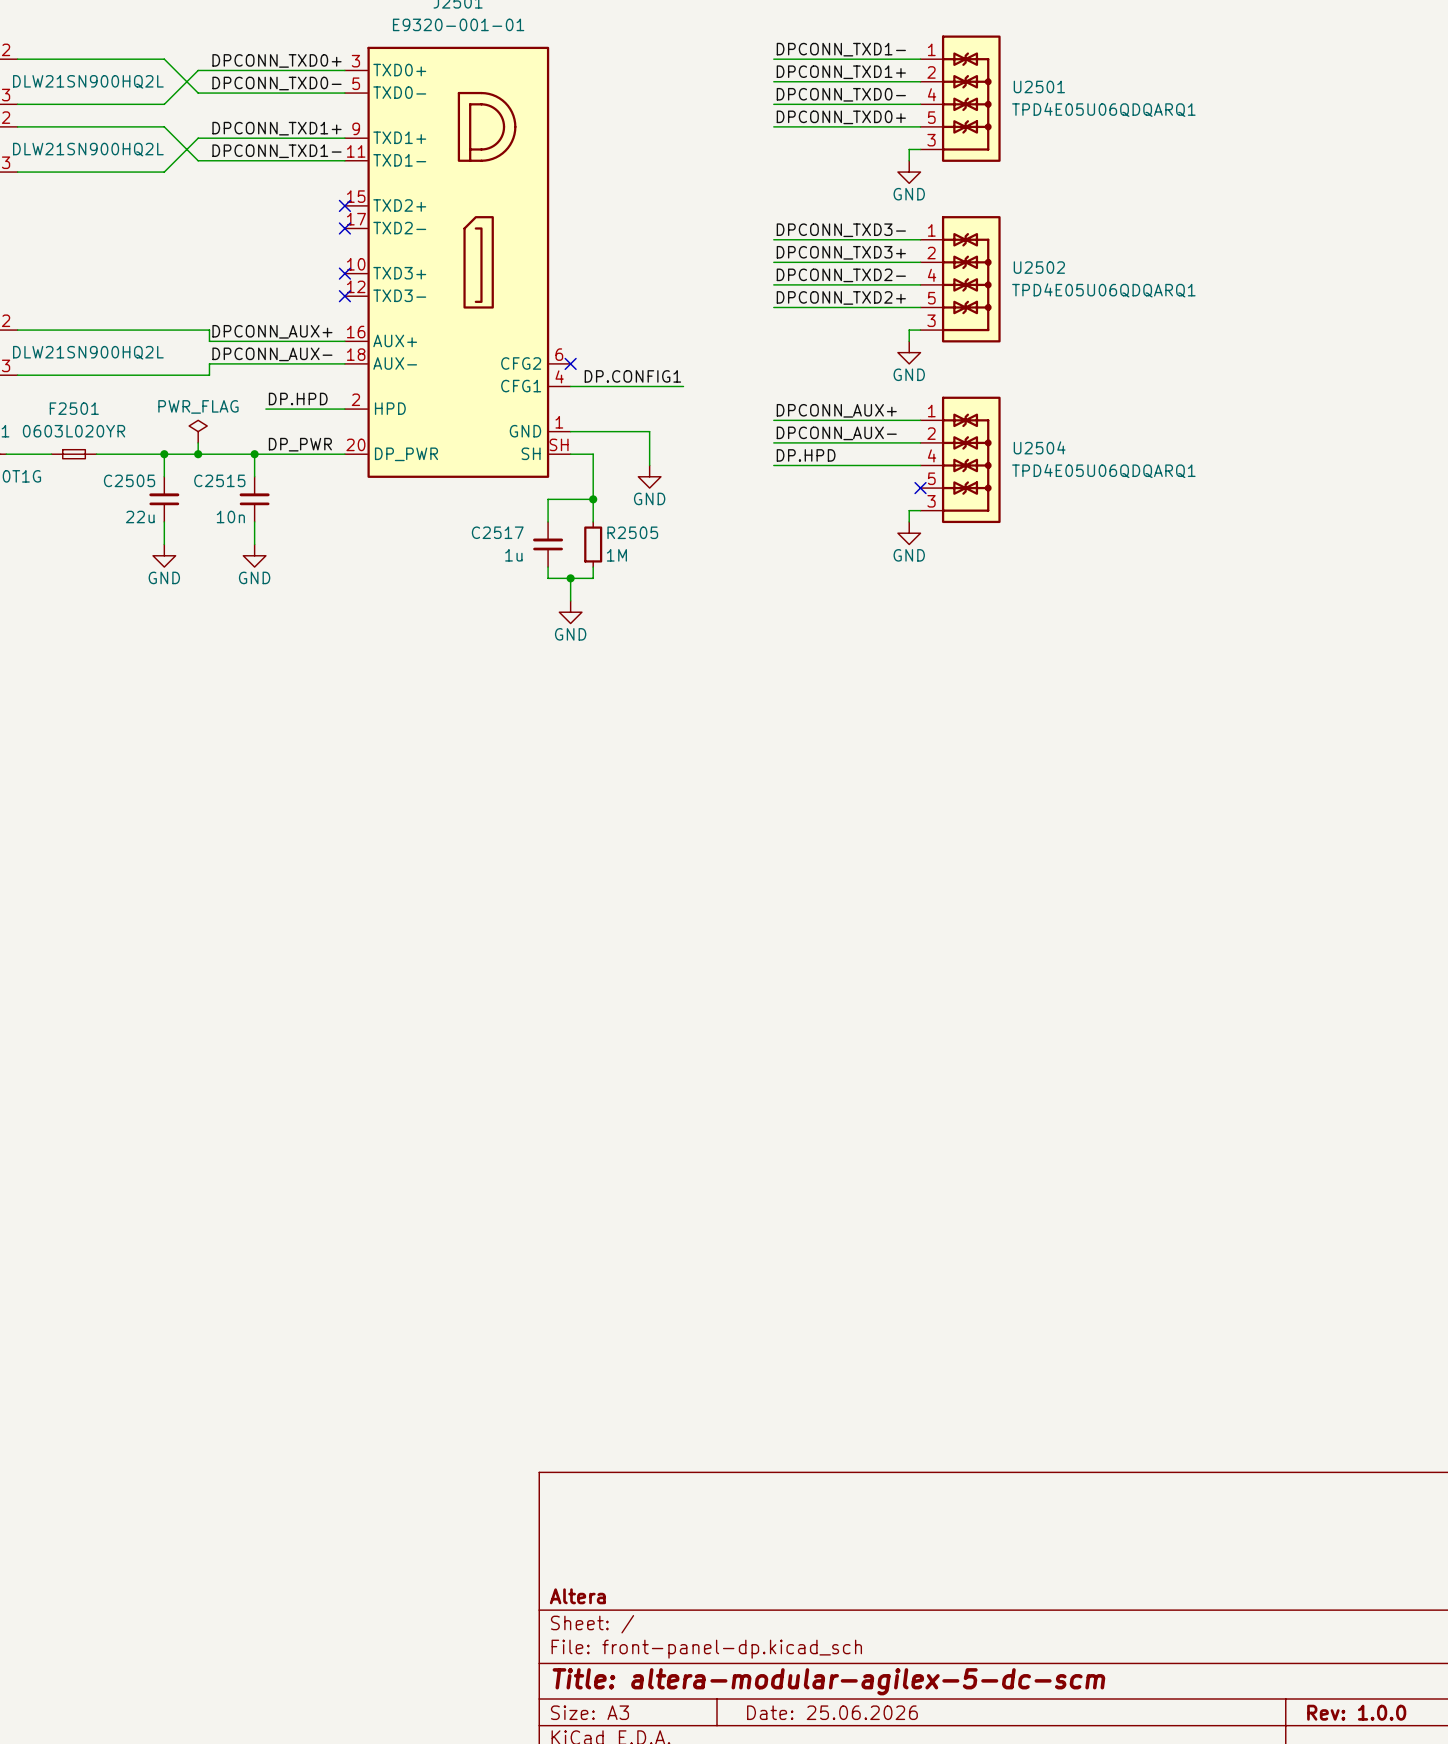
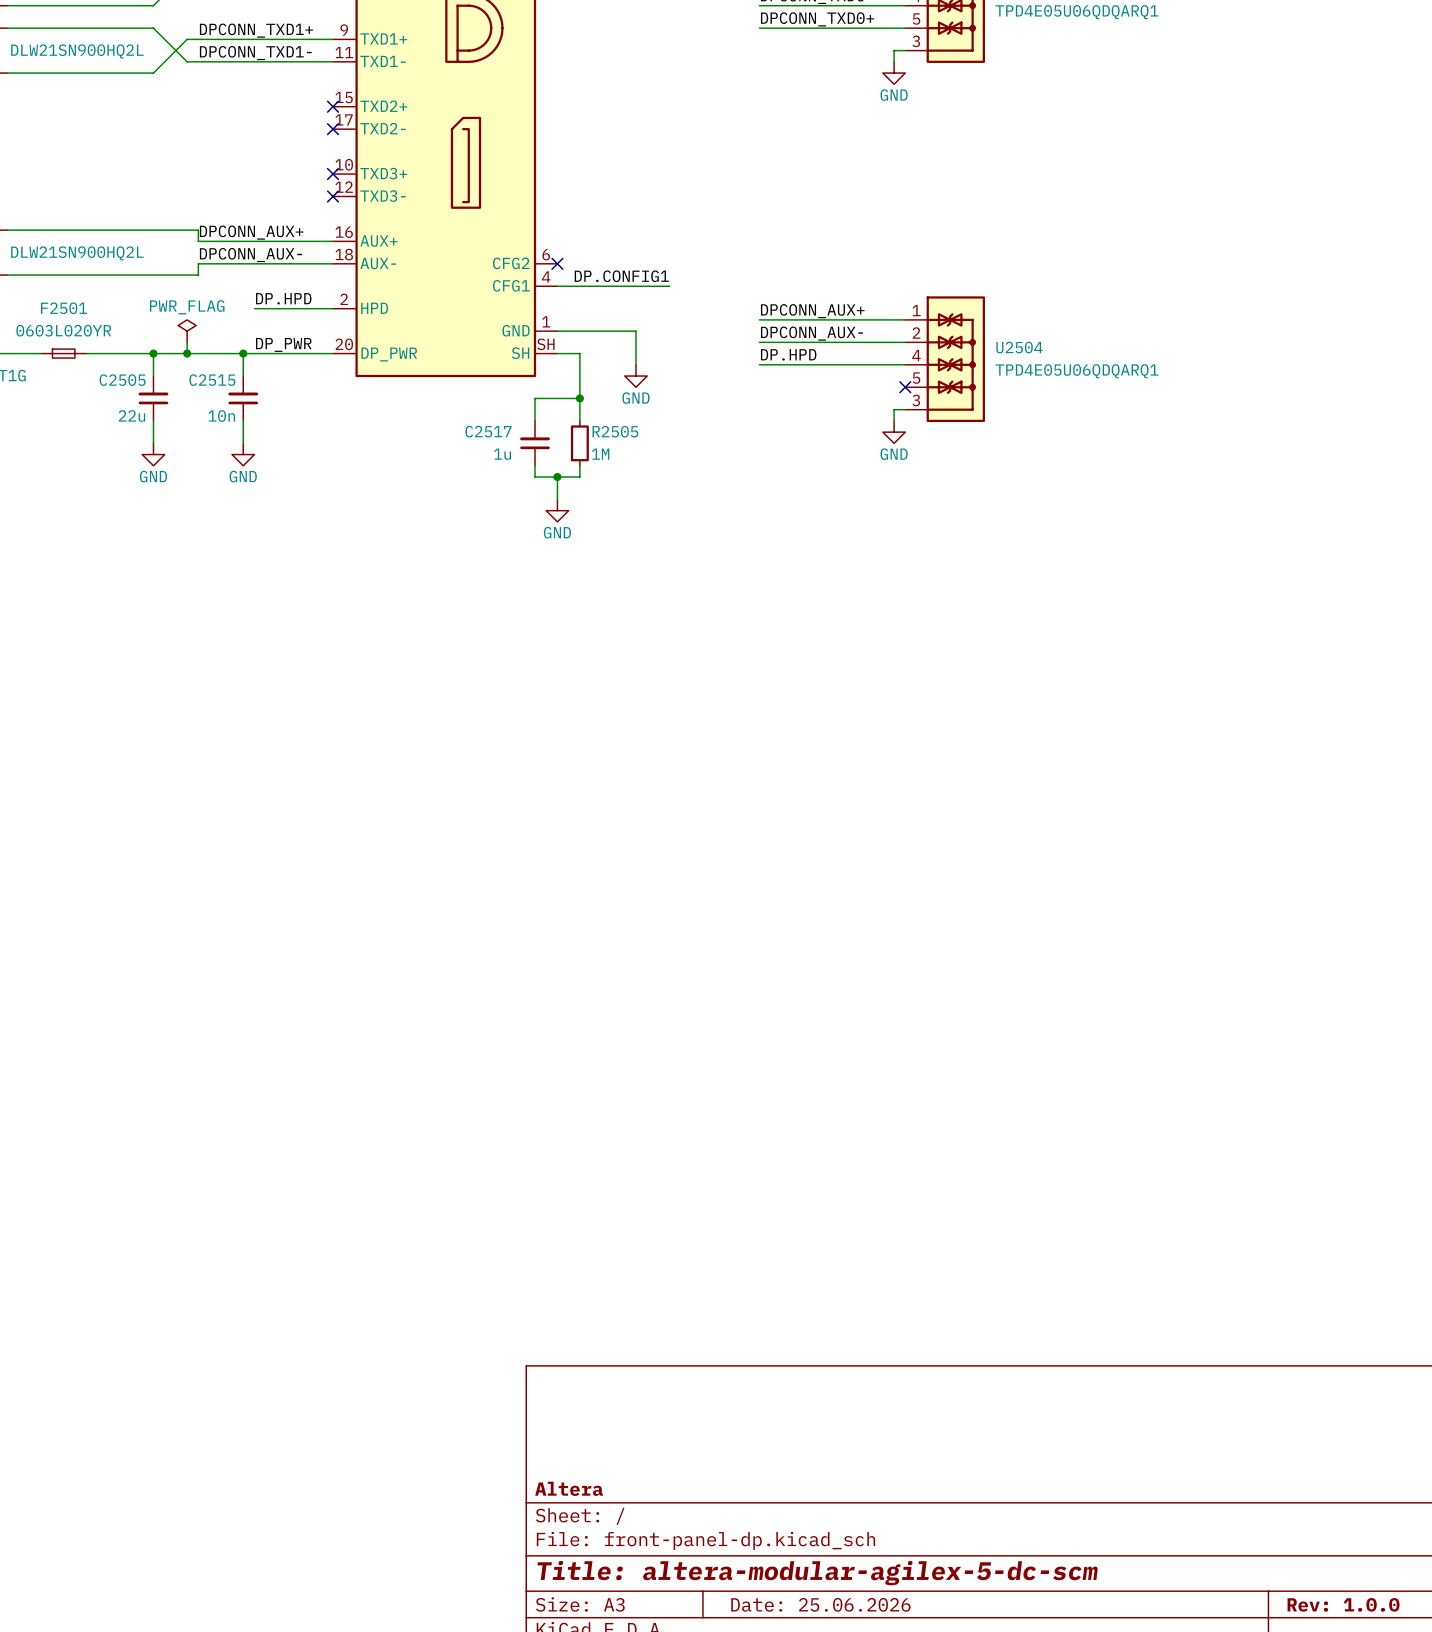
label: DPCONN_TXD3- (841, 230) -> none
wire: (773, 239) (920, 239) -> none
label: DPCONN_TXD3+ (841, 252) -> none
wire: (773, 262) (920, 262) -> none
label: DPCONN_TXD2- (841, 275) -> none
U2502: (960, 279) -> none
wire: (773, 284) (920, 284) -> none
label: DPCONN_TXD2+ (841, 297) -> none
wire: (773, 307) (920, 307) -> none
wire: (920, 330) (909, 330) (909, 341) -> none
power symbol: GND (909, 352) -> none

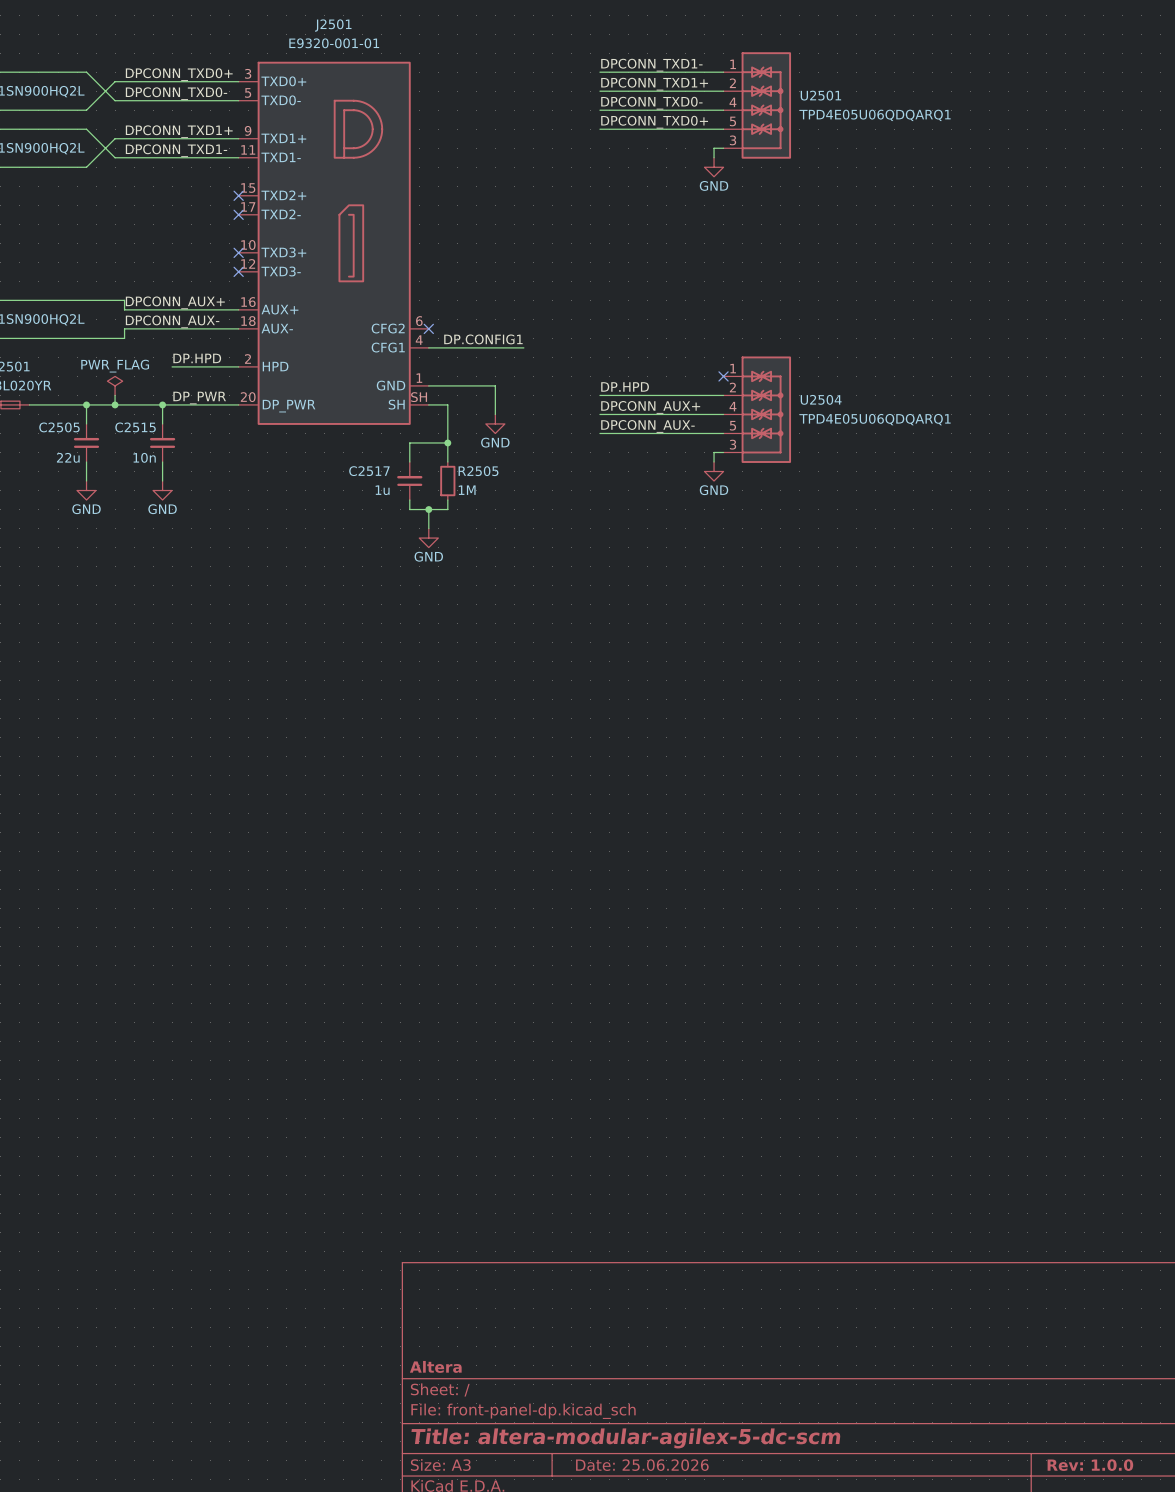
label: DPCONN_AUX+ (812, 311) -> none
wire: (759, 319) (905, 319) -> (599, 433) (723, 433)
no-connect mark: none -> (723, 376)
label: DPCONN_AUX- (811, 333) -> DP.HPD (625, 386)
label: DP.HPD (788, 354) -> DPCONN_AUX+ (650, 407)
label: none -> DPCONN_AUX- (647, 426)
no-connect mark: (905, 387) -> none

